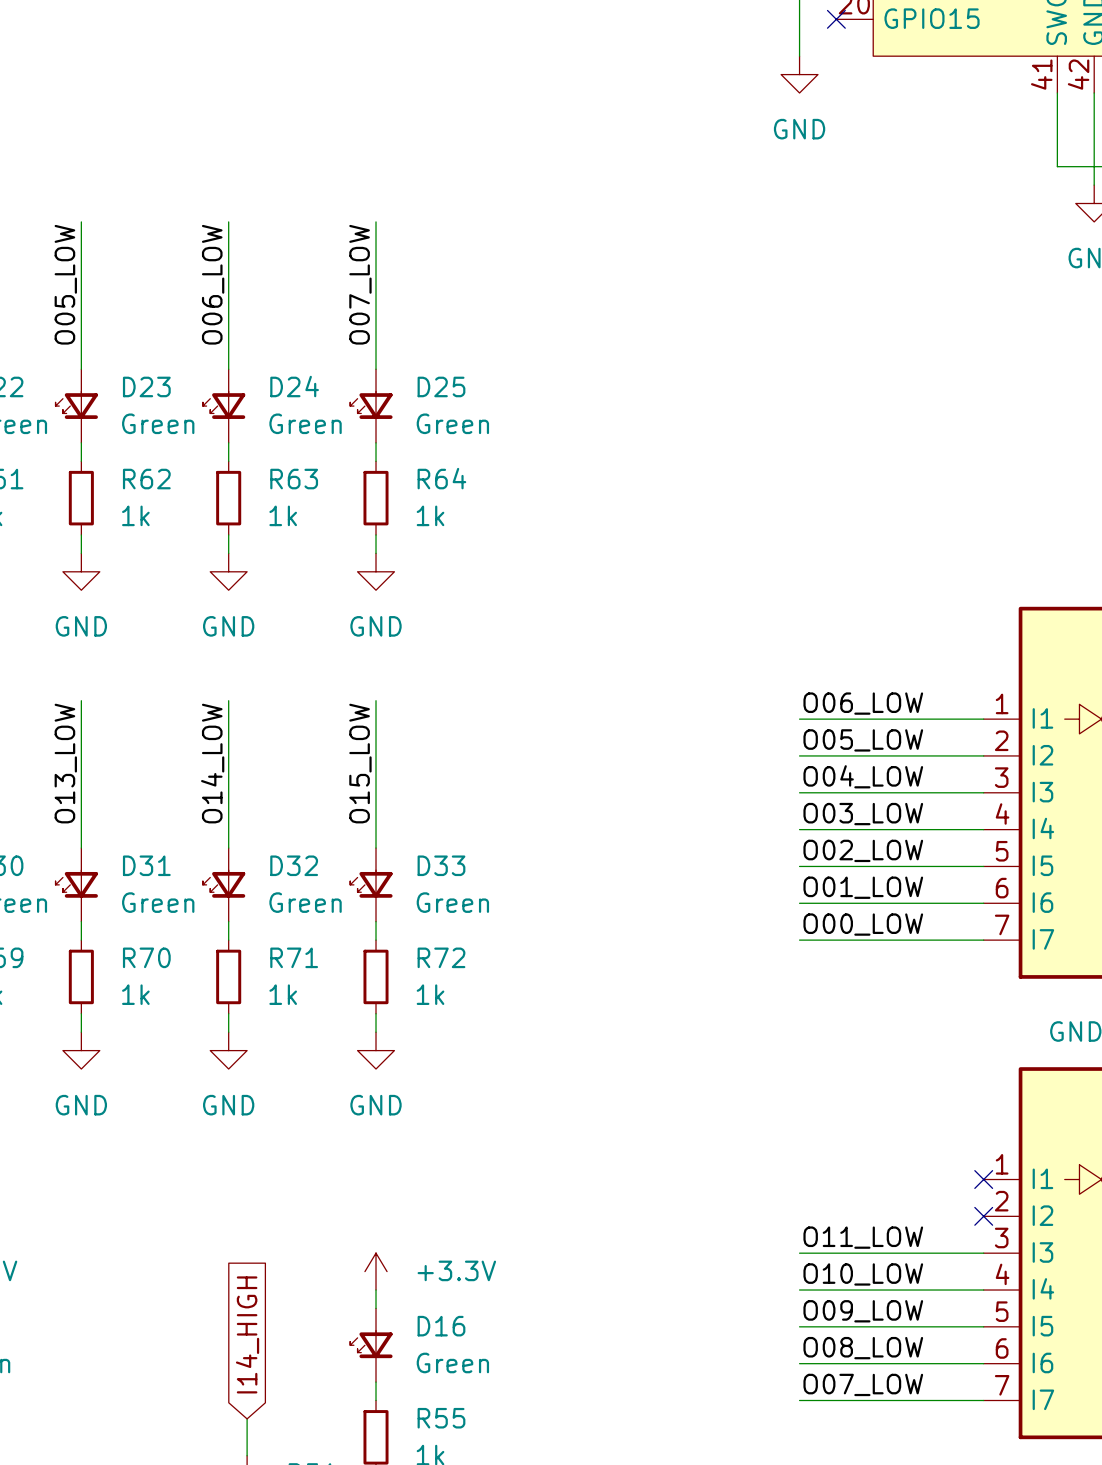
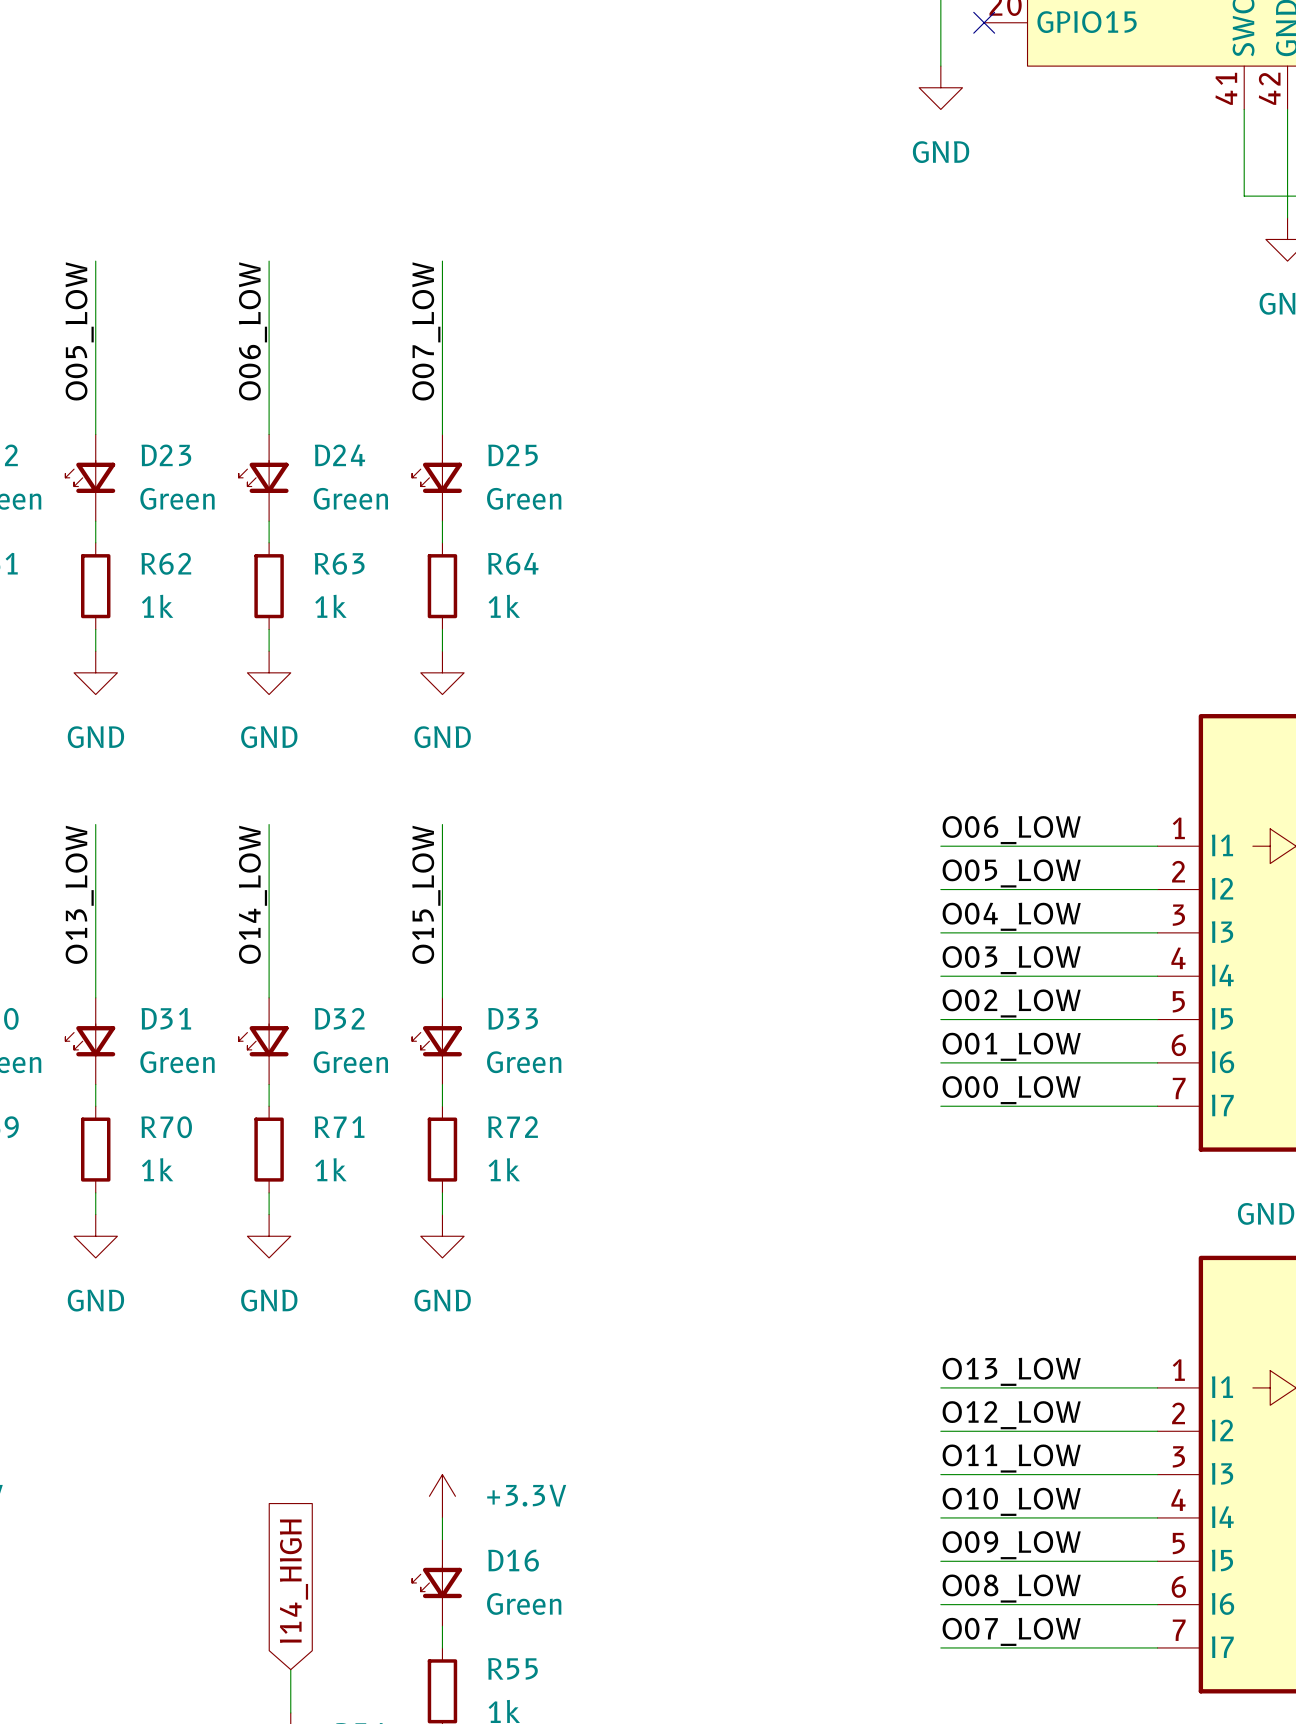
label: none -> O13_LOW (1011, 1371)
wire: none -> (940, 1387) (1157, 1387)
no-connect mark: (983, 1179) -> none
label: none -> O12_LOW (1011, 1415)
wire: none -> (940, 1431) (1157, 1431)
no-connect mark: (983, 1216) -> none

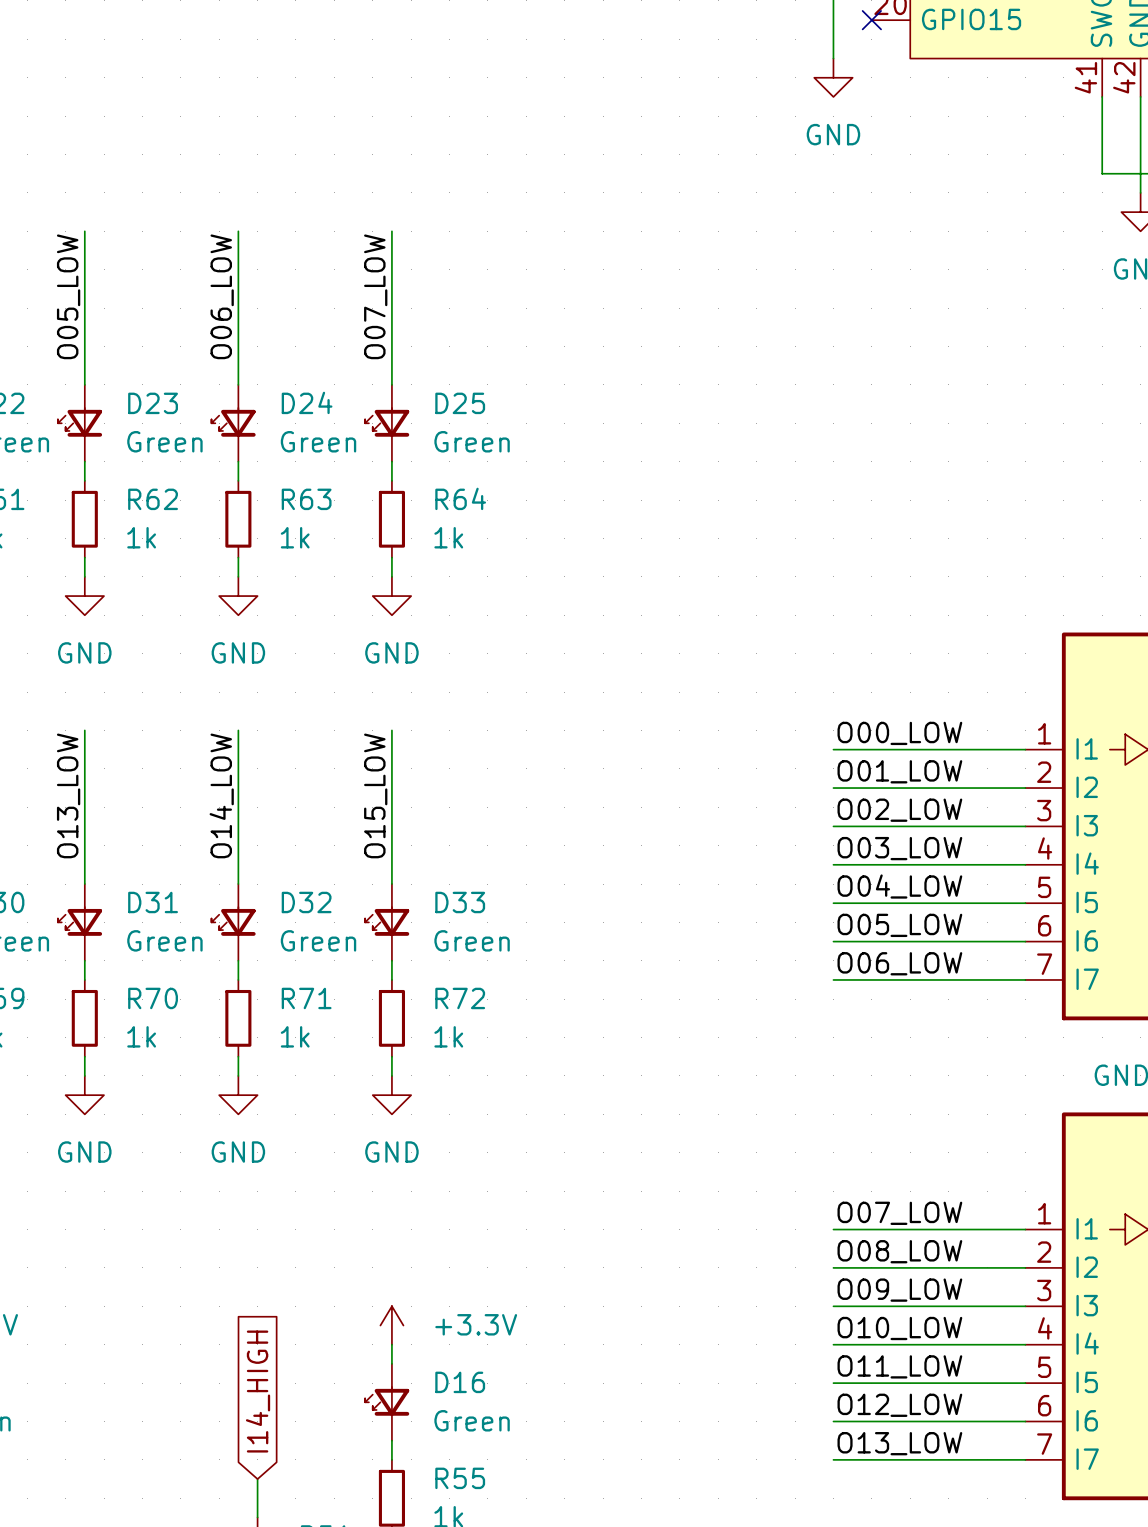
label: O06_LOW (1011, 830) -> O00_LOW (899, 733)
label: O05_LOW (1011, 873) -> O01_LOW (899, 771)
label: O04_LOW (1011, 916) -> O02_LOW (899, 810)
label: O02_LOW (1011, 1003) -> O04_LOW (899, 886)
label: O01_LOW (1011, 1046) -> O05_LOW (899, 925)
label: O00_LOW (1011, 1090) -> O06_LOW (899, 963)
label: O13_LOW (1011, 1371) -> O07_LOW (899, 1213)
label: O12_LOW (1011, 1415) -> O08_LOW (899, 1251)
label: O11_LOW (1011, 1458) -> O09_LOW (899, 1290)
label: O09_LOW (1011, 1545) -> O11_LOW (899, 1366)
label: O08_LOW (1011, 1588) -> O12_LOW (899, 1405)
label: O07_LOW (1011, 1631) -> O13_LOW (899, 1443)

